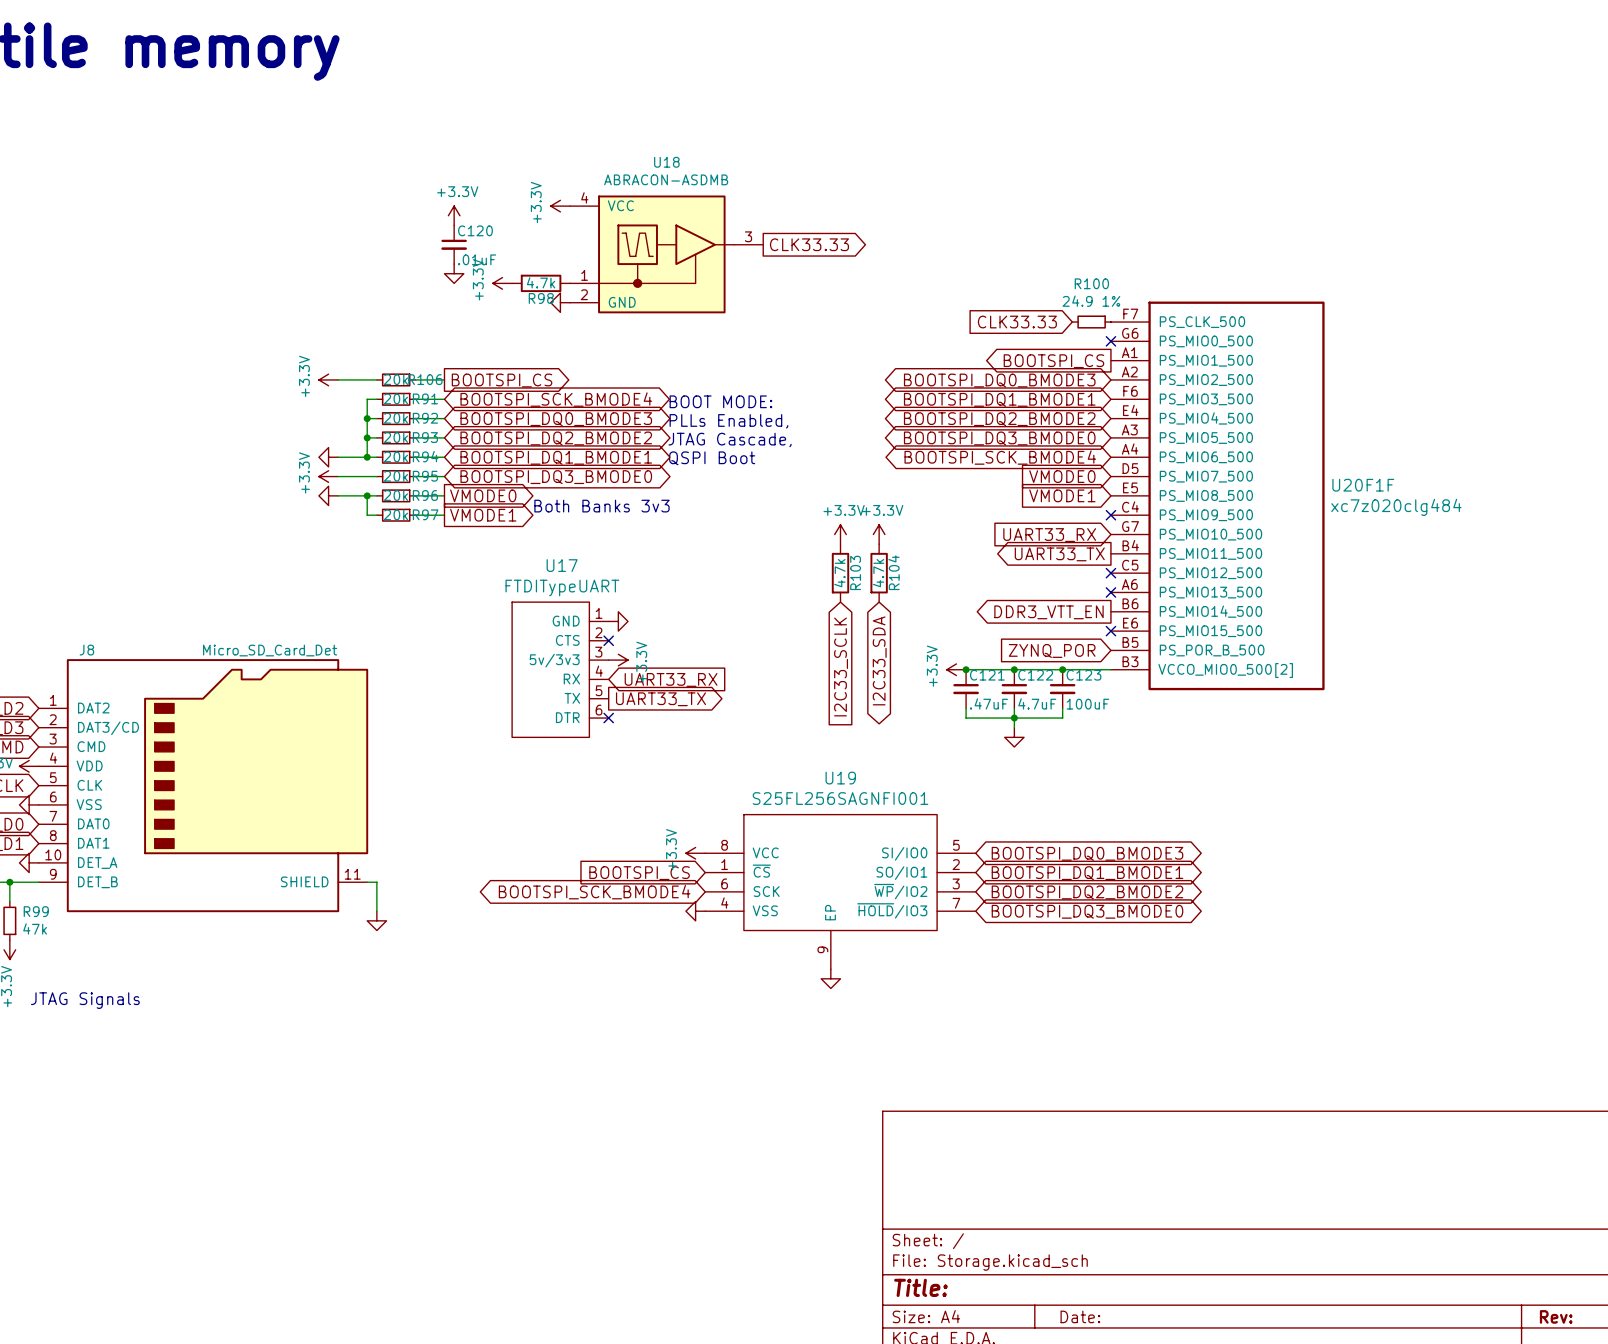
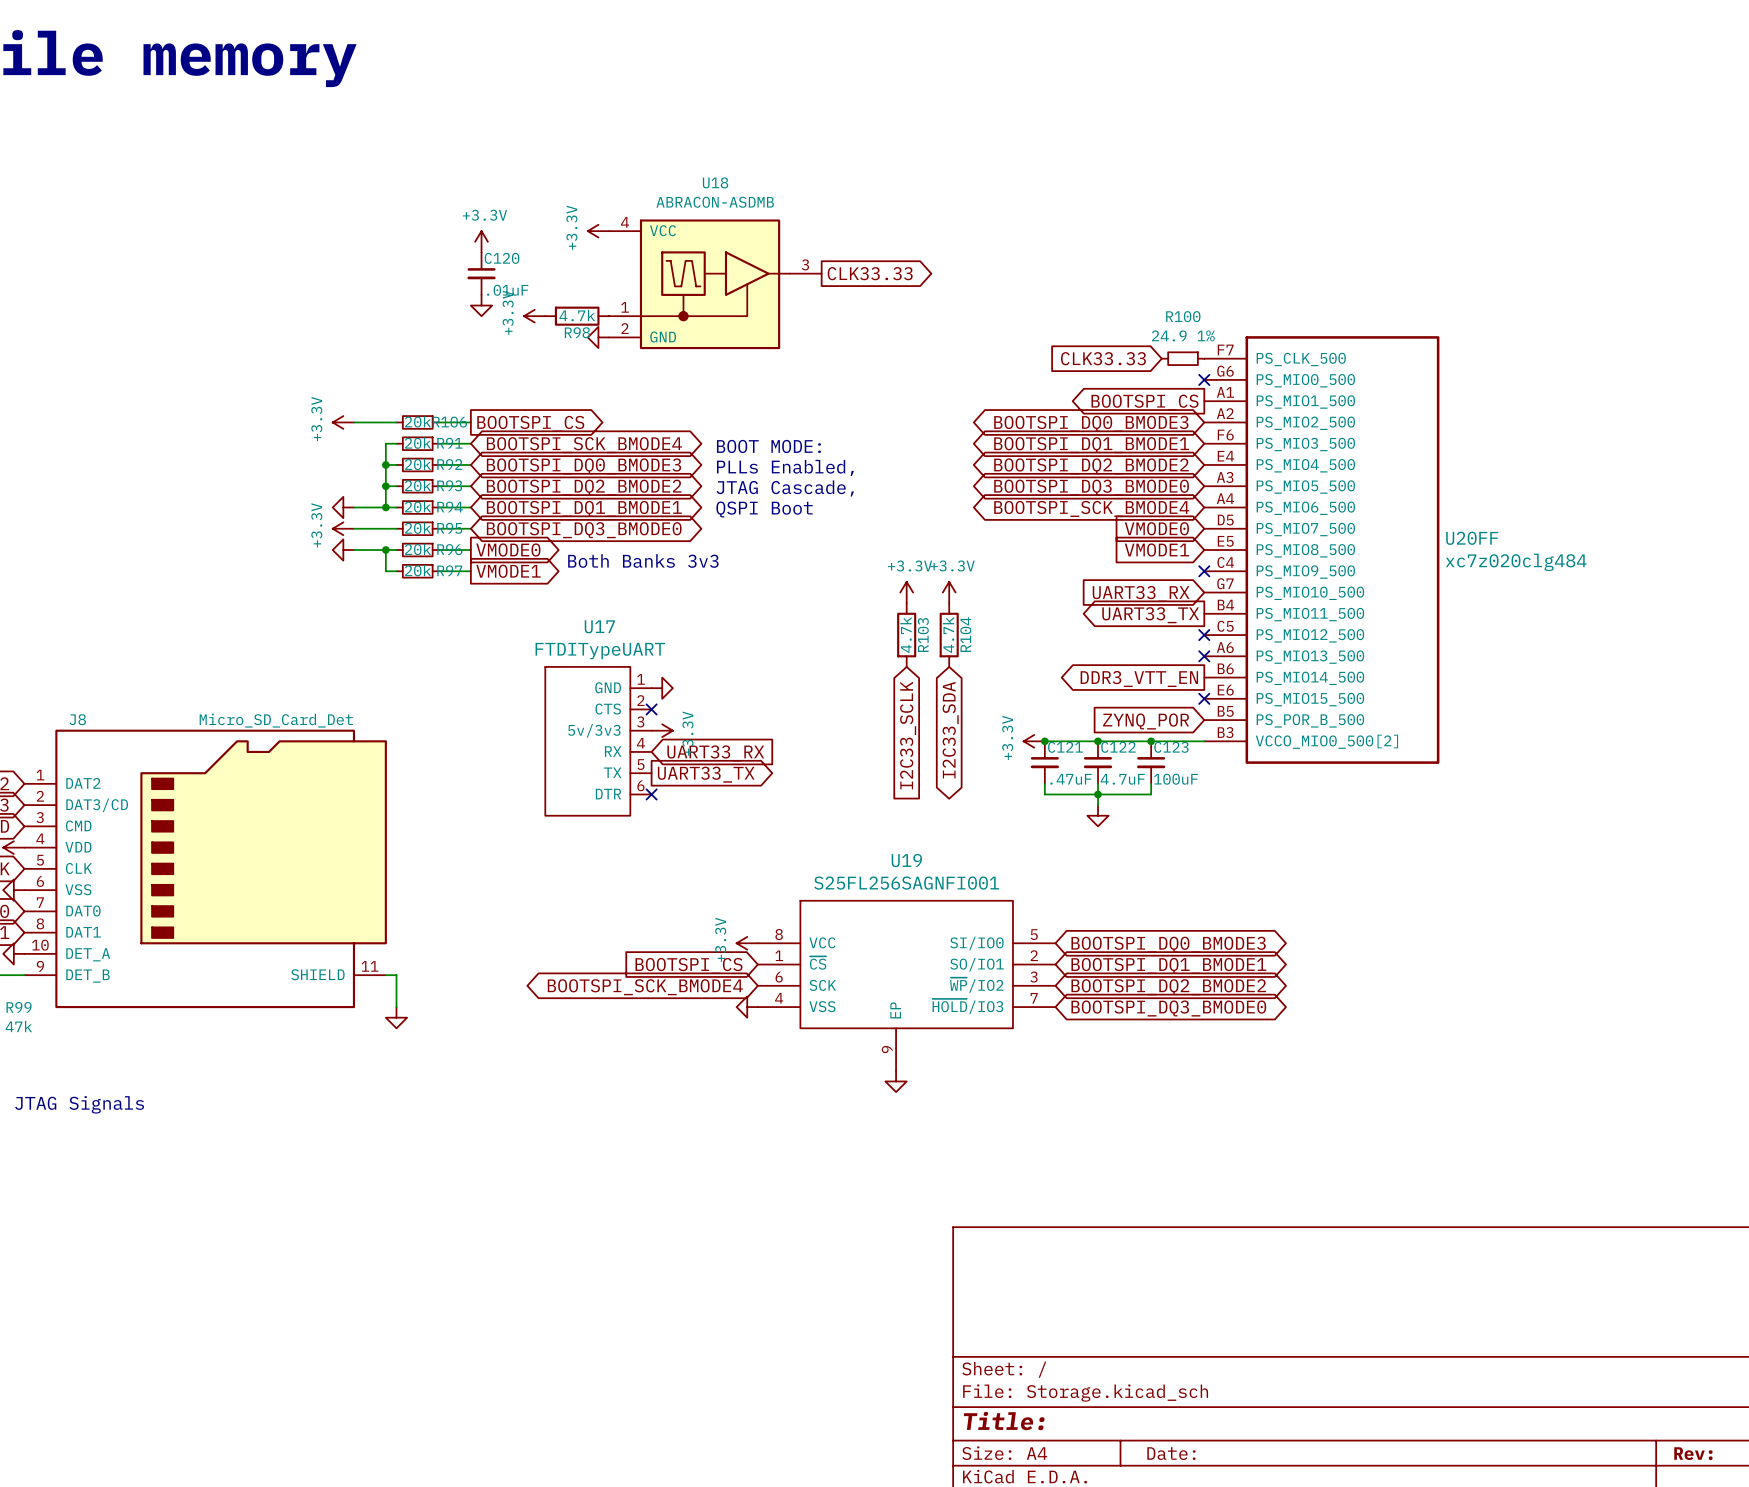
U20F1F name: U20F1F (1363, 485) -> U20FF (1472, 538)

